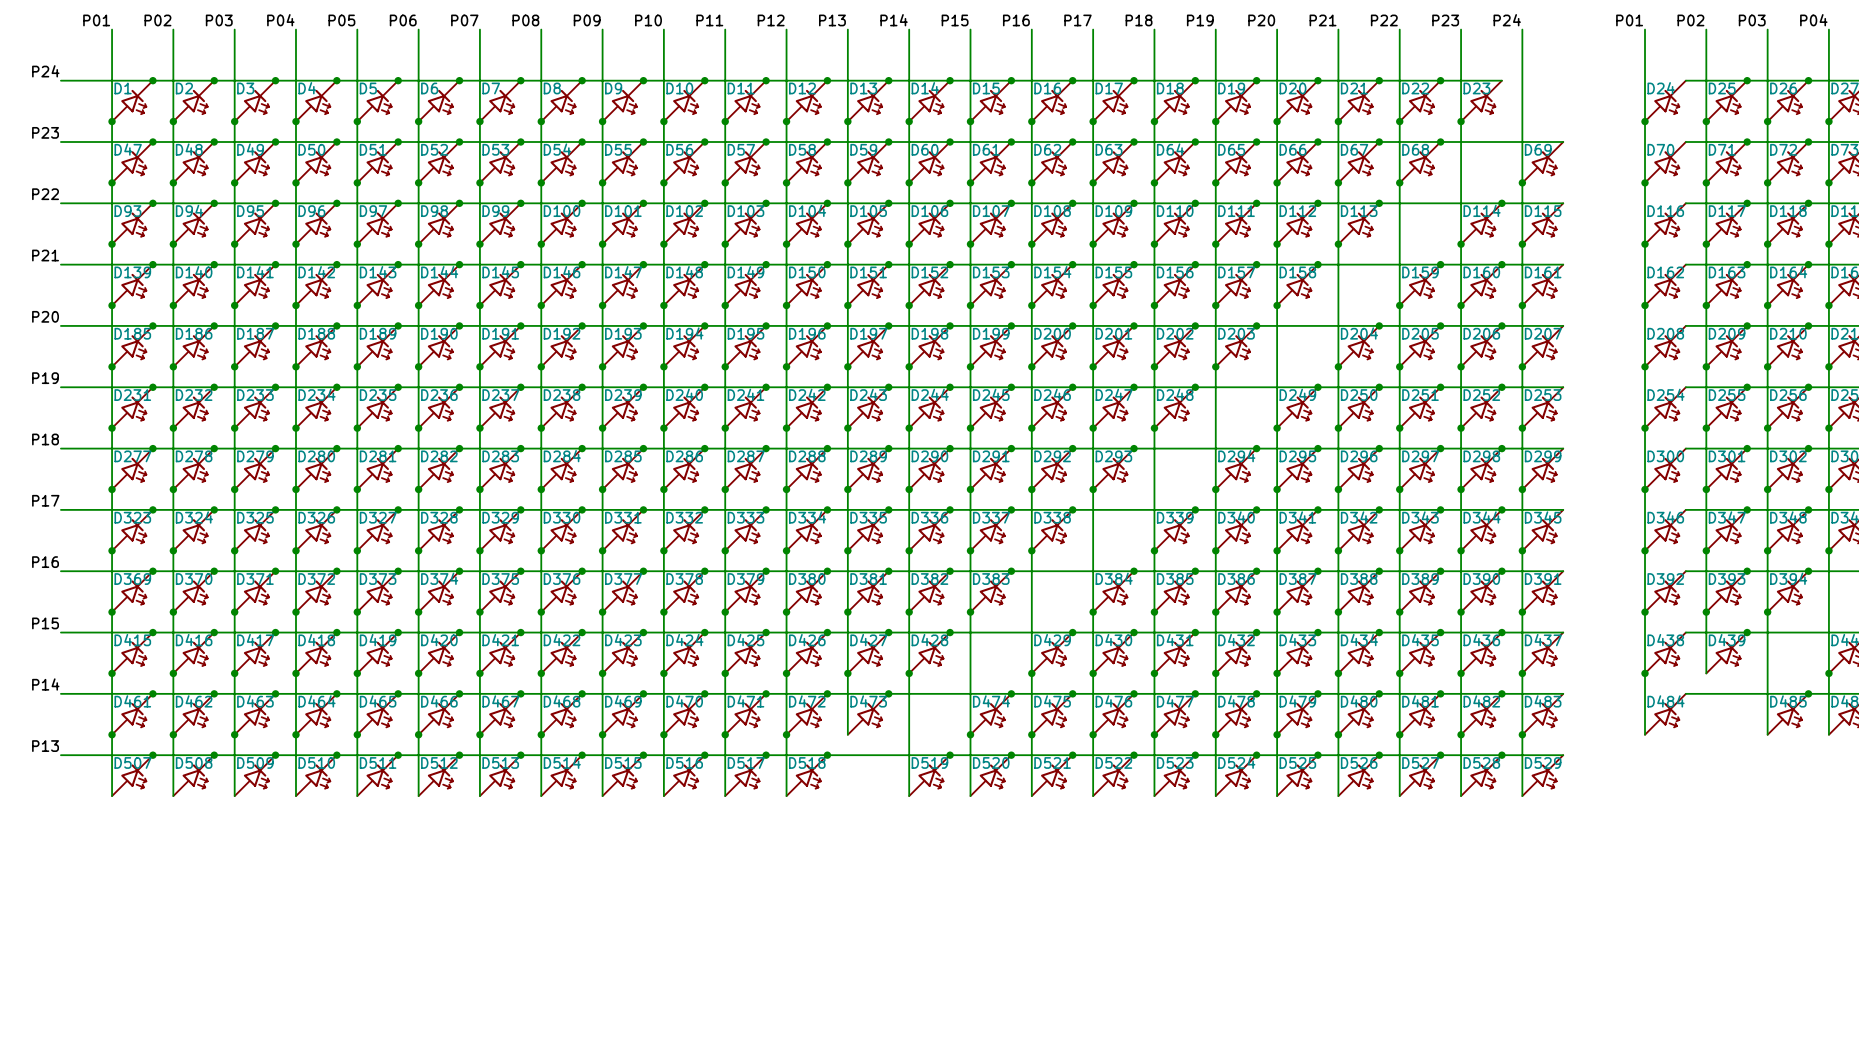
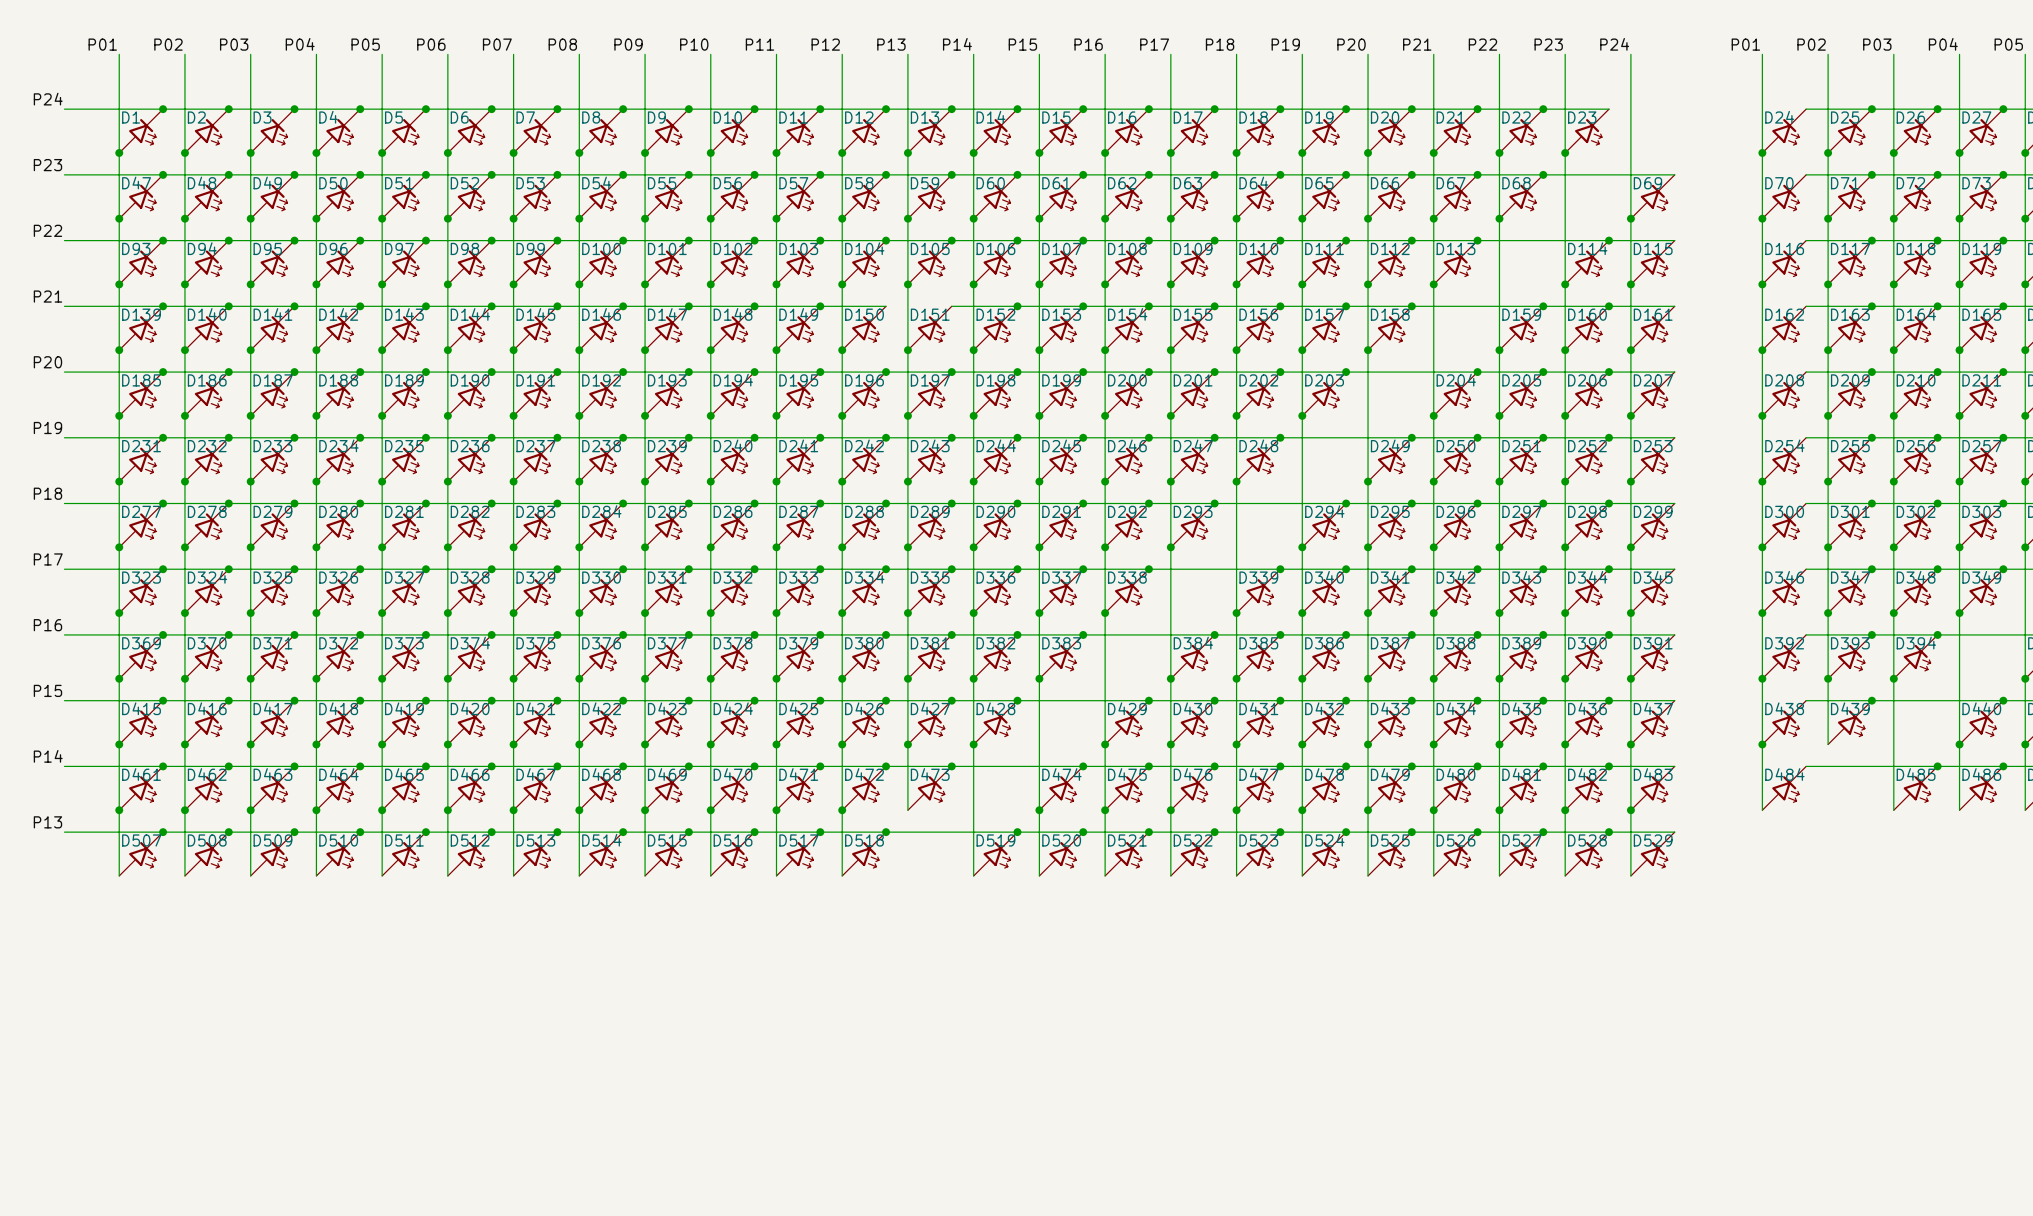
wire: (827, 264) (888, 264) -> none
junction: (827, 264) -> none
junction: (888, 264) -> none

